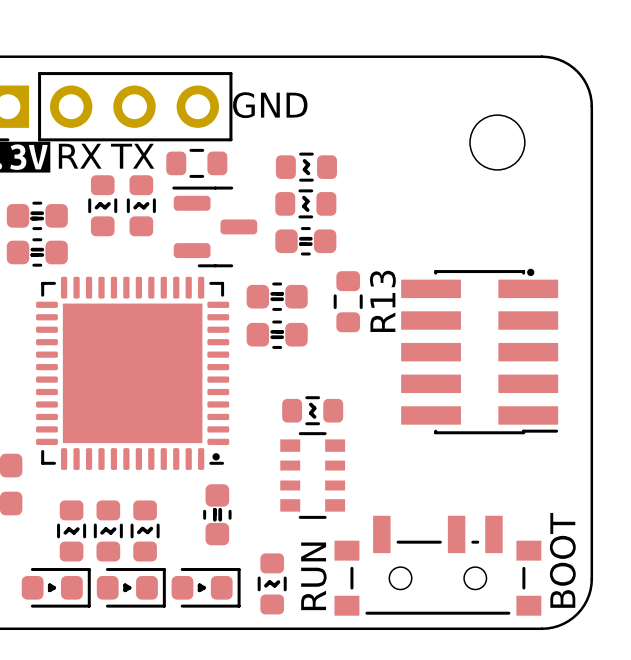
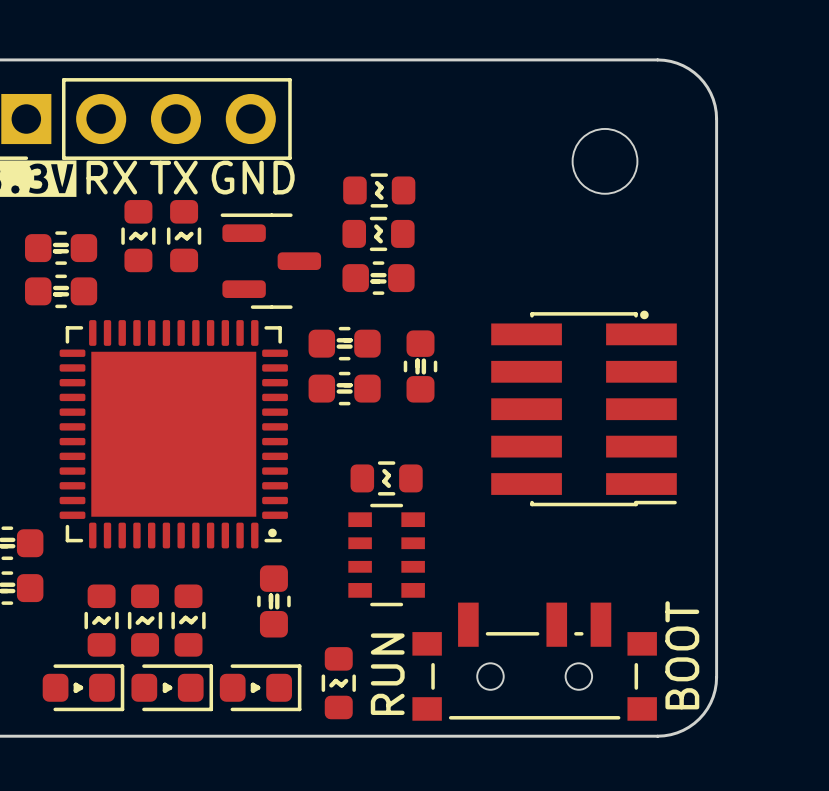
text position: GND (270, 105) -> GND (253, 177)
part: (196, 163) -> none
R13: (348, 301) -> none
line: none -> (417, 360) (417, 372)
line: none -> (423, 360) (423, 372)
part: none -> (420, 366)

